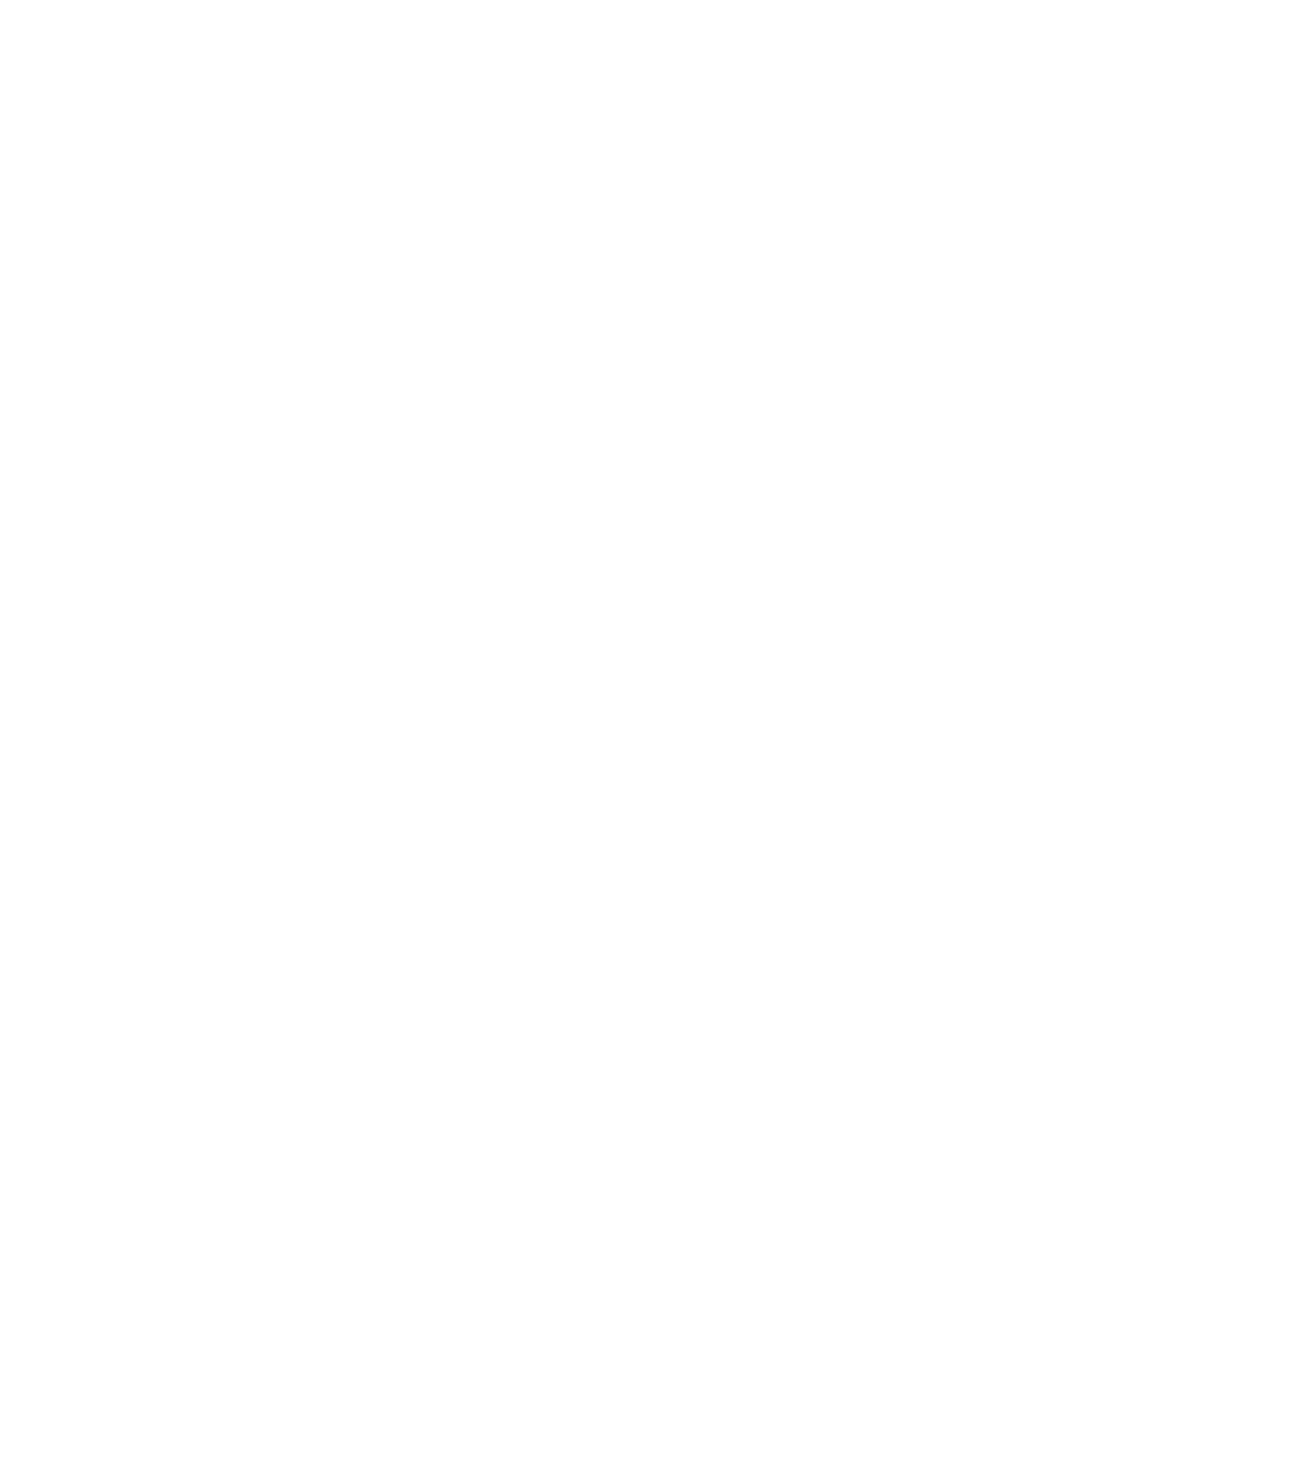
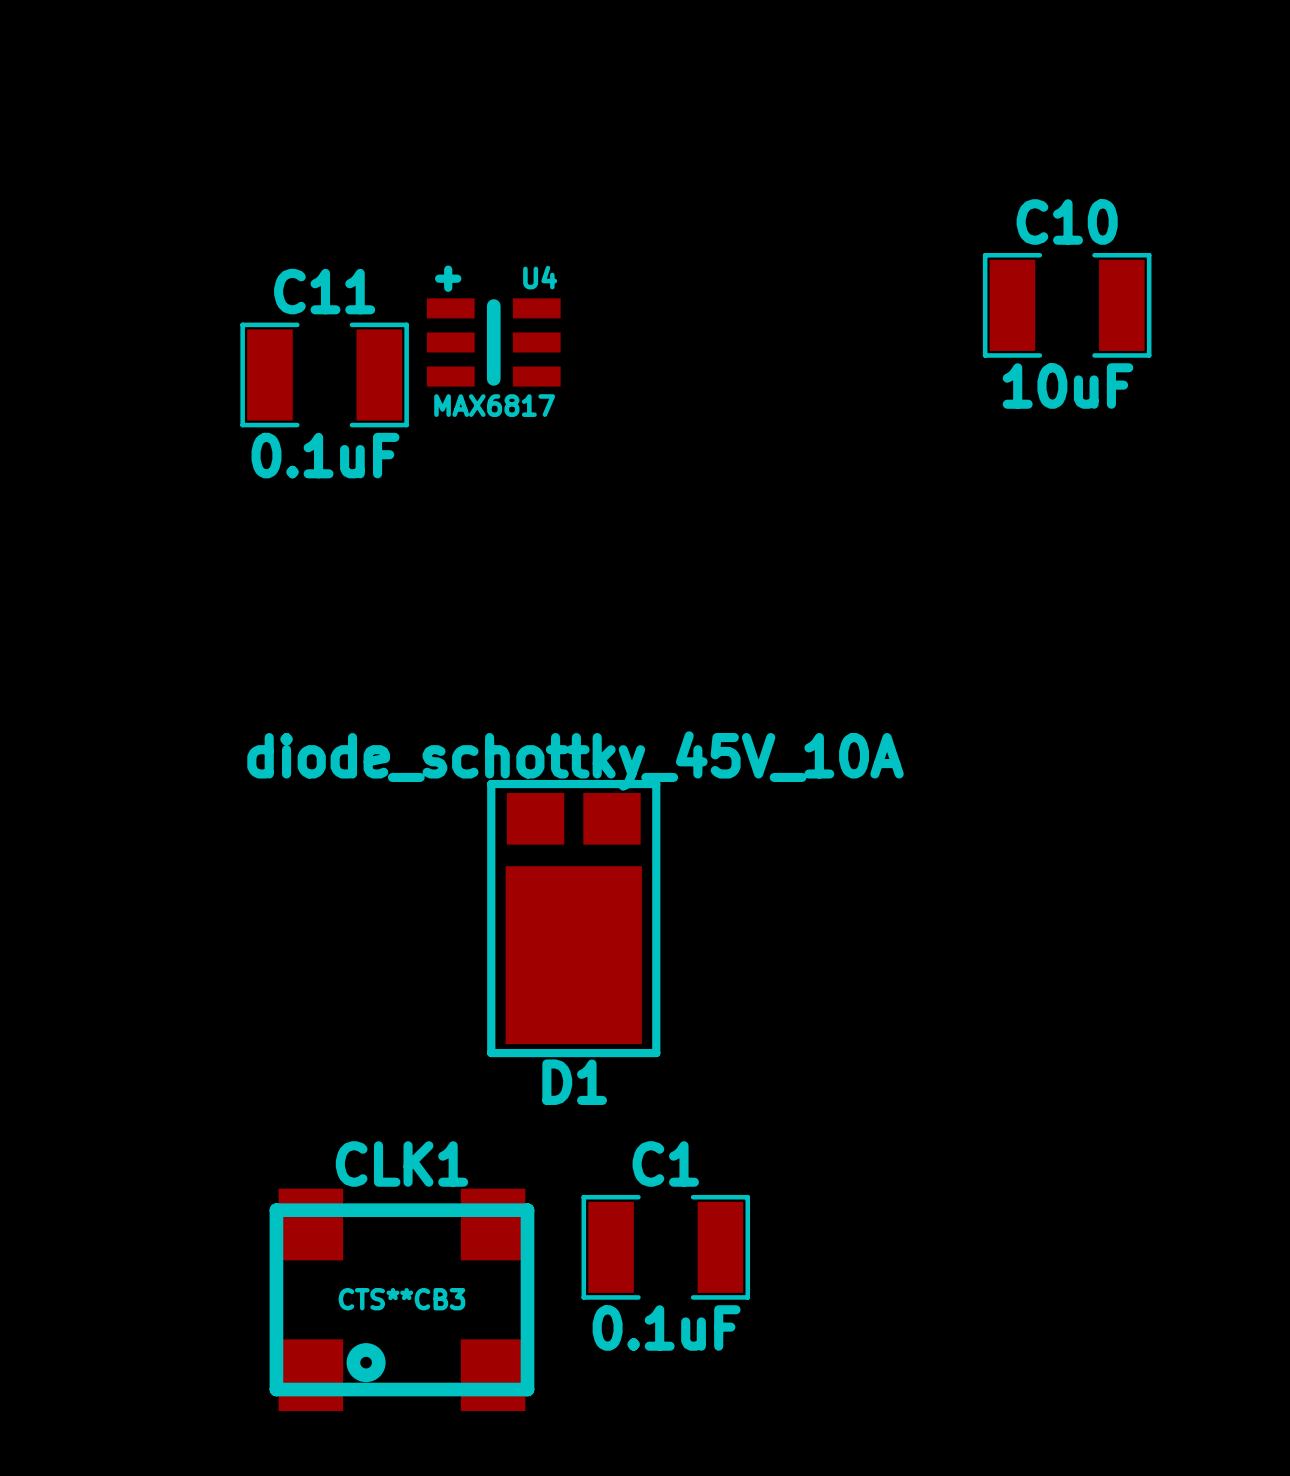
C10: none -> 10uF (1067, 305)
U4: none -> MAX6817 (493, 326)
C11: none -> 0.1uF (324, 374)
D1: none -> diode_schottky_45V_10A (573, 918)
C1: none -> 0.1uF (665, 1247)
CLK1: none -> (401, 1299)

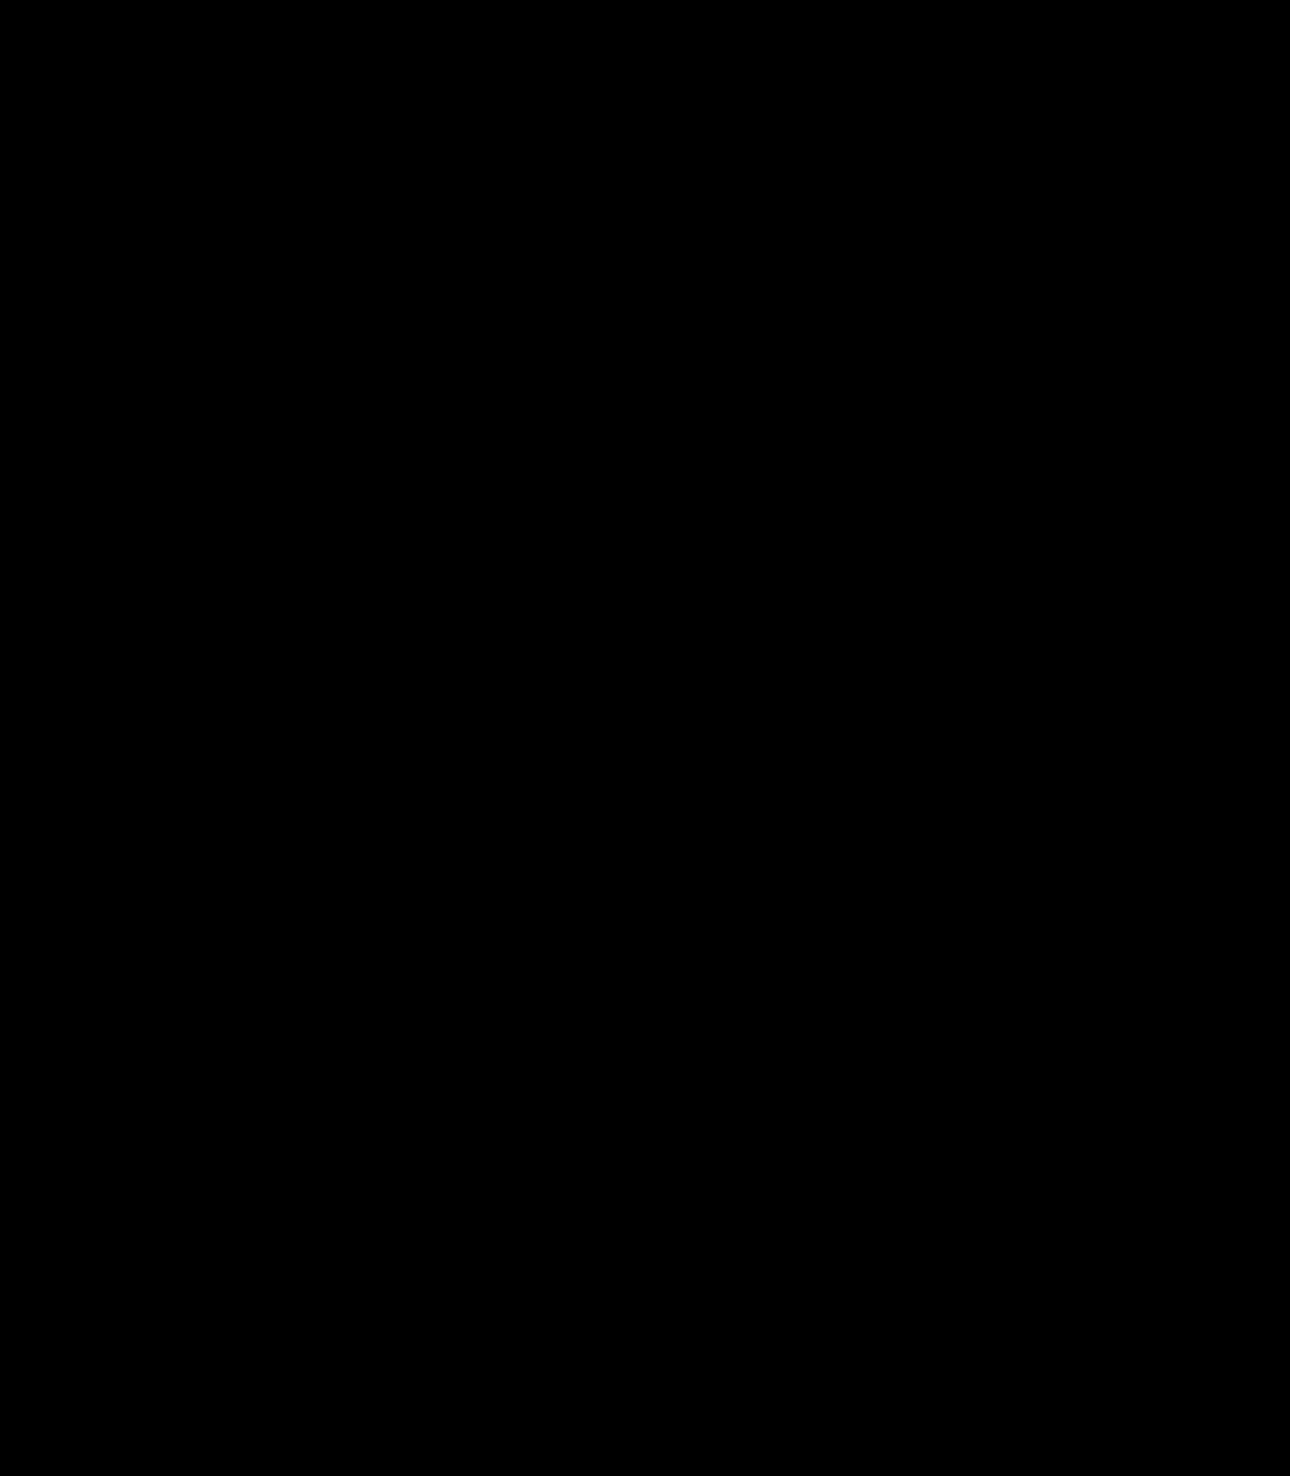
C10: 10uF (1067, 305) -> none
U4: MAX6817 (493, 326) -> none
C11: 0.1uF (324, 374) -> none
D1: diode_schottky_45V_10A (573, 918) -> none
C1: 0.1uF (665, 1247) -> none
CLK1: (401, 1299) -> none

